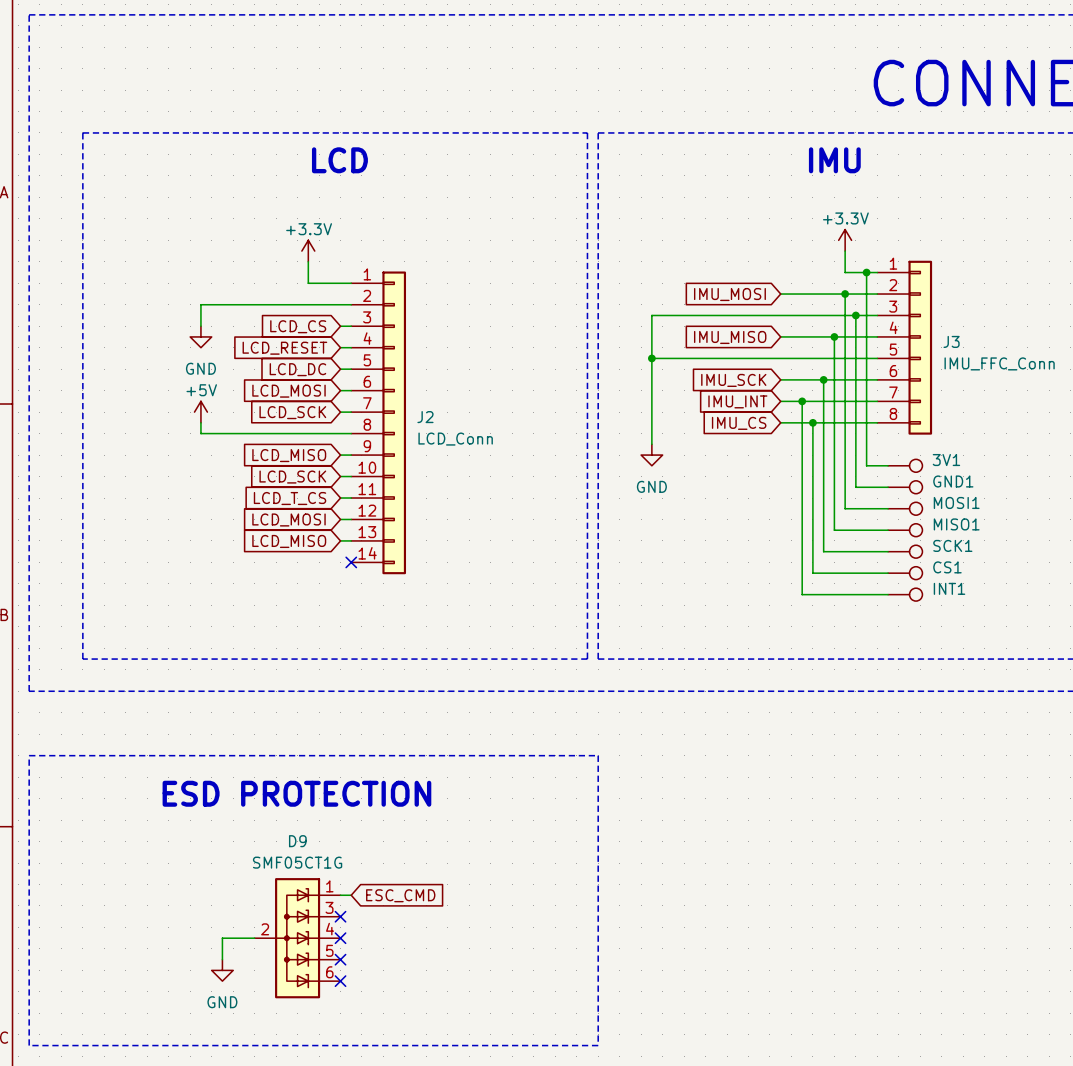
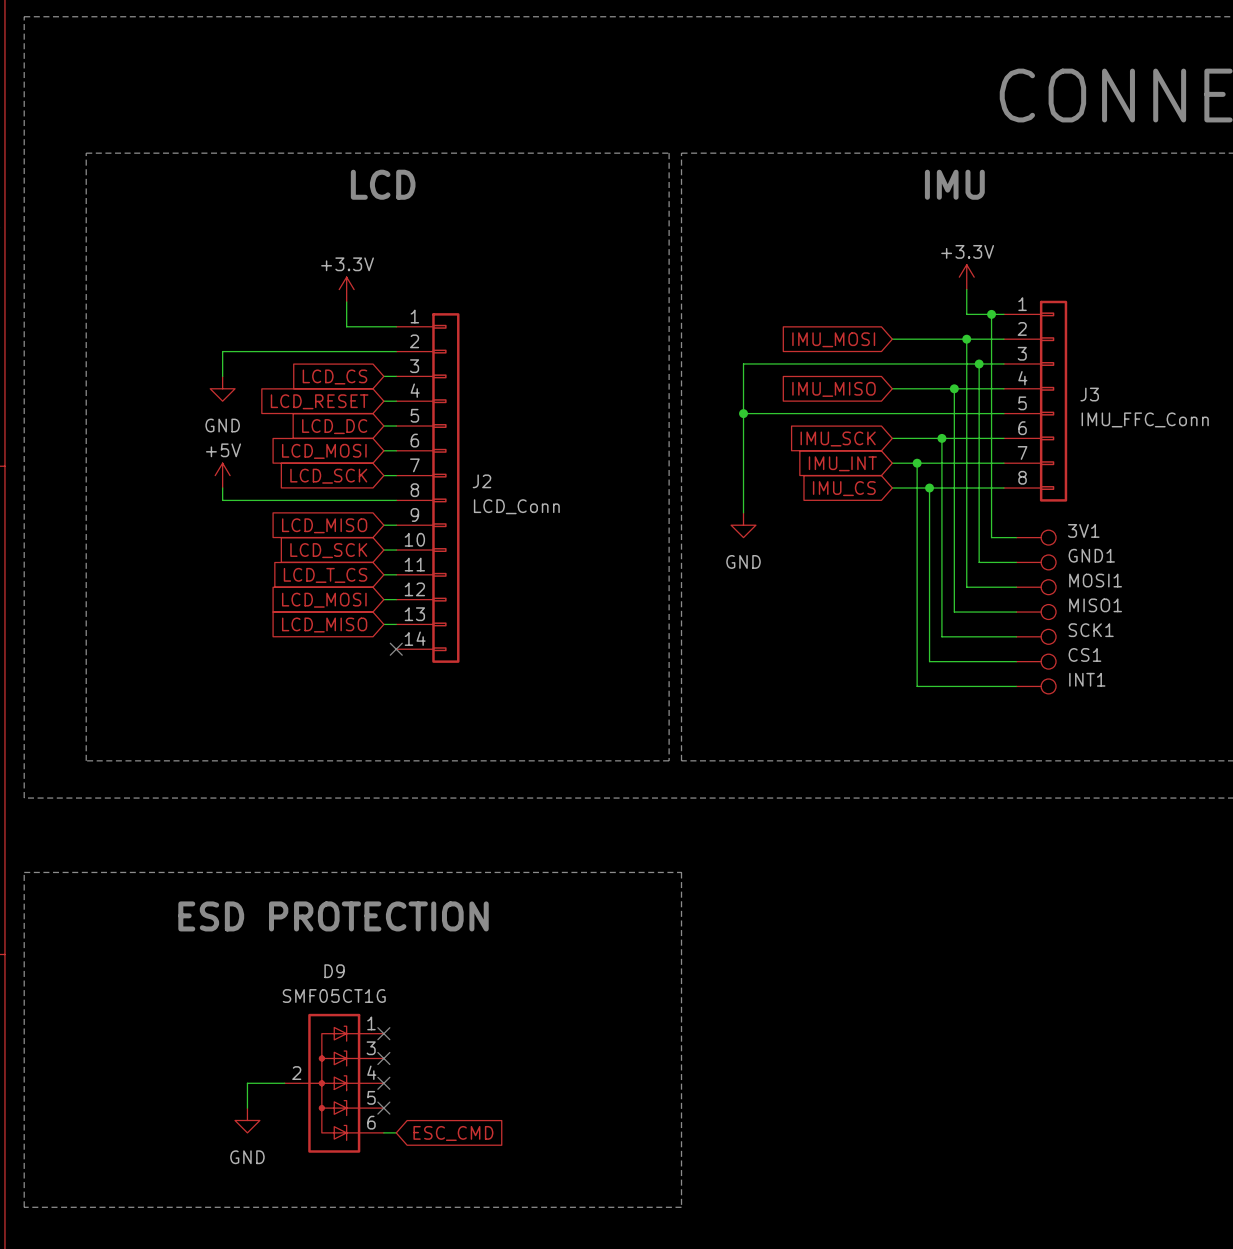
wire: (340, 895) (351, 895) -> (383, 1132) (396, 1132)
no-connect mark: none -> (383, 1033)
global label position: ESC_CMD (400, 895) -> ESC_CMD (453, 1133)
no-connect mark: (340, 981) -> none

